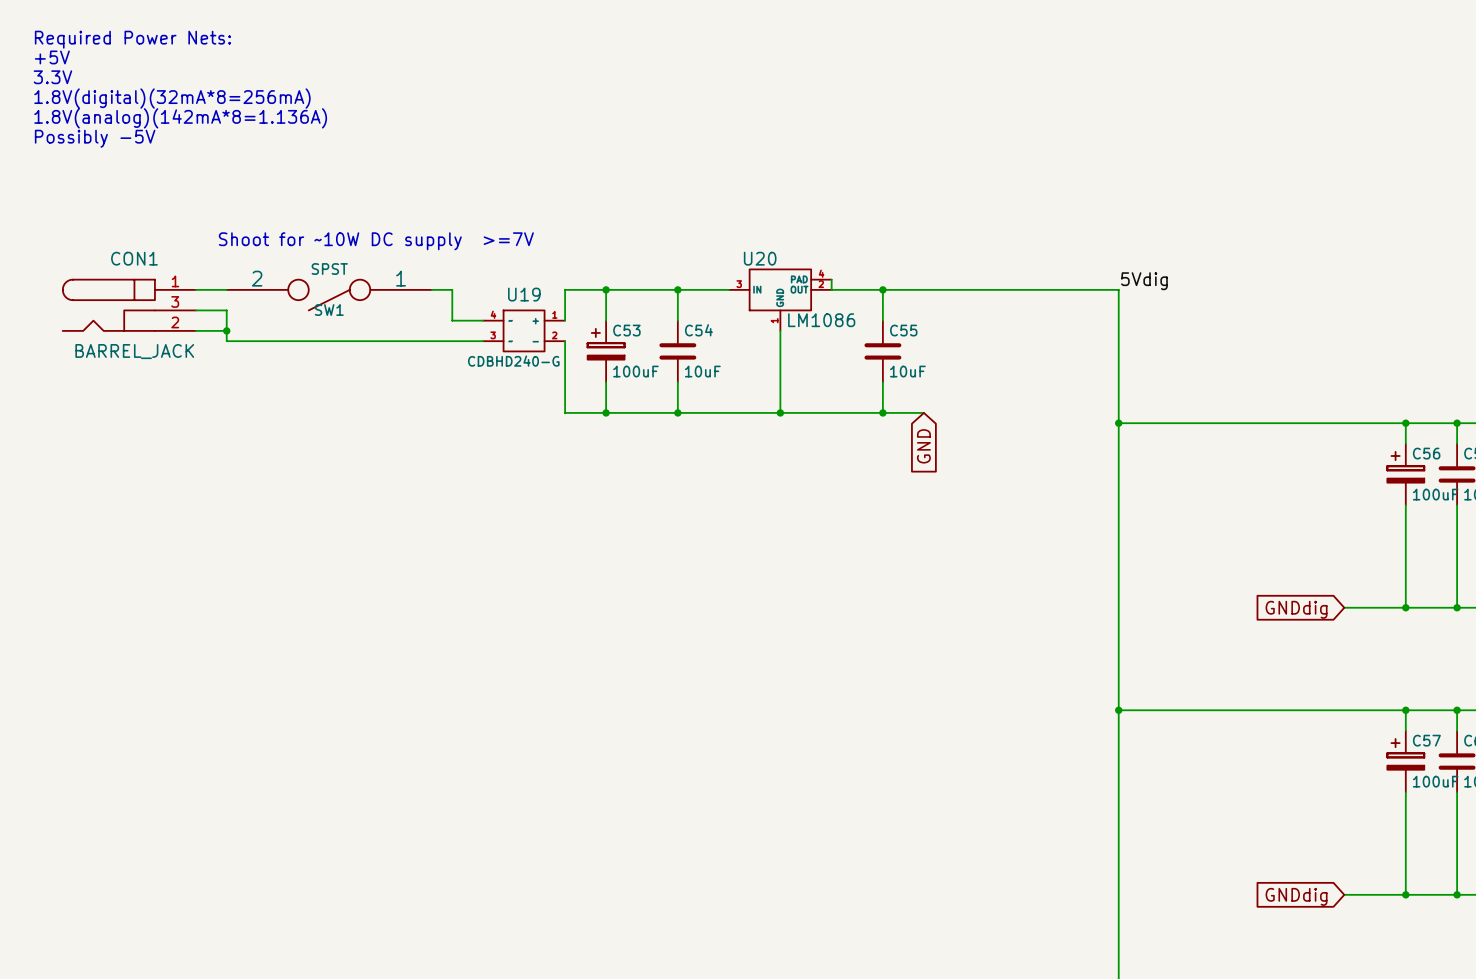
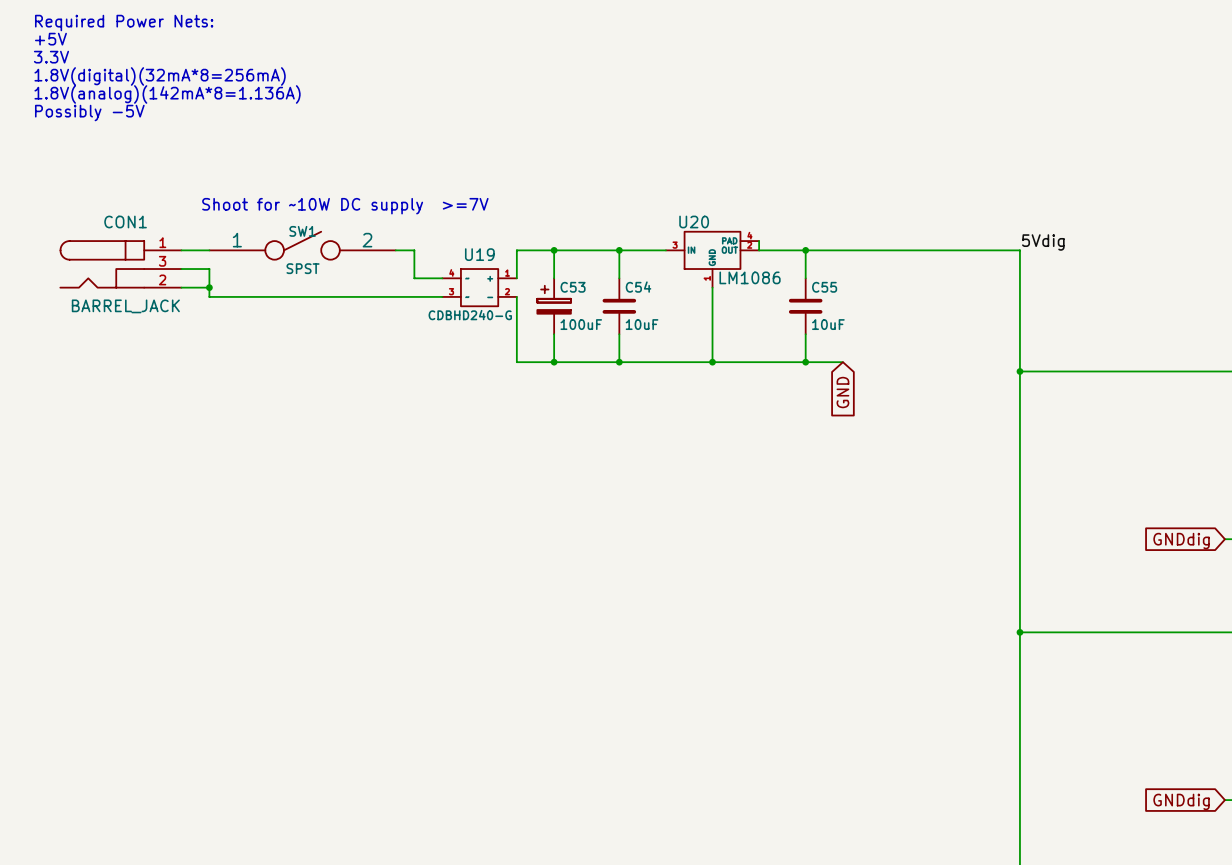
SW1 rotation: 0° (329, 295) -> 180° (302, 245)

